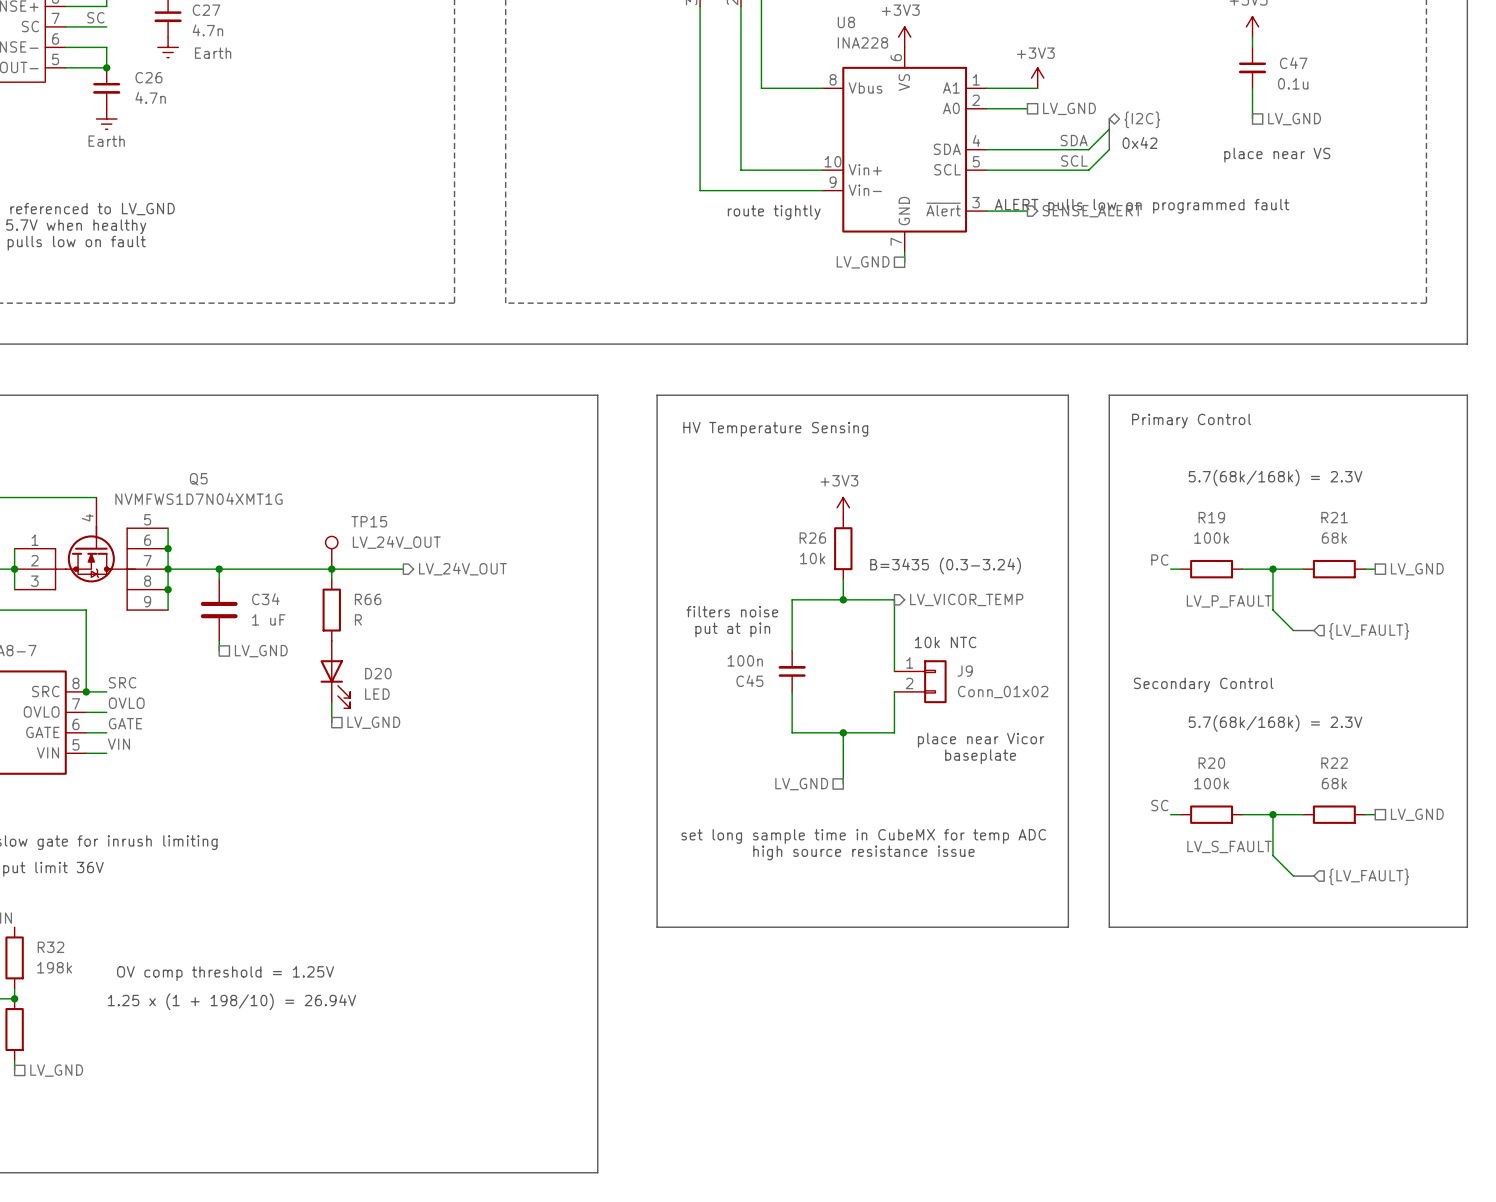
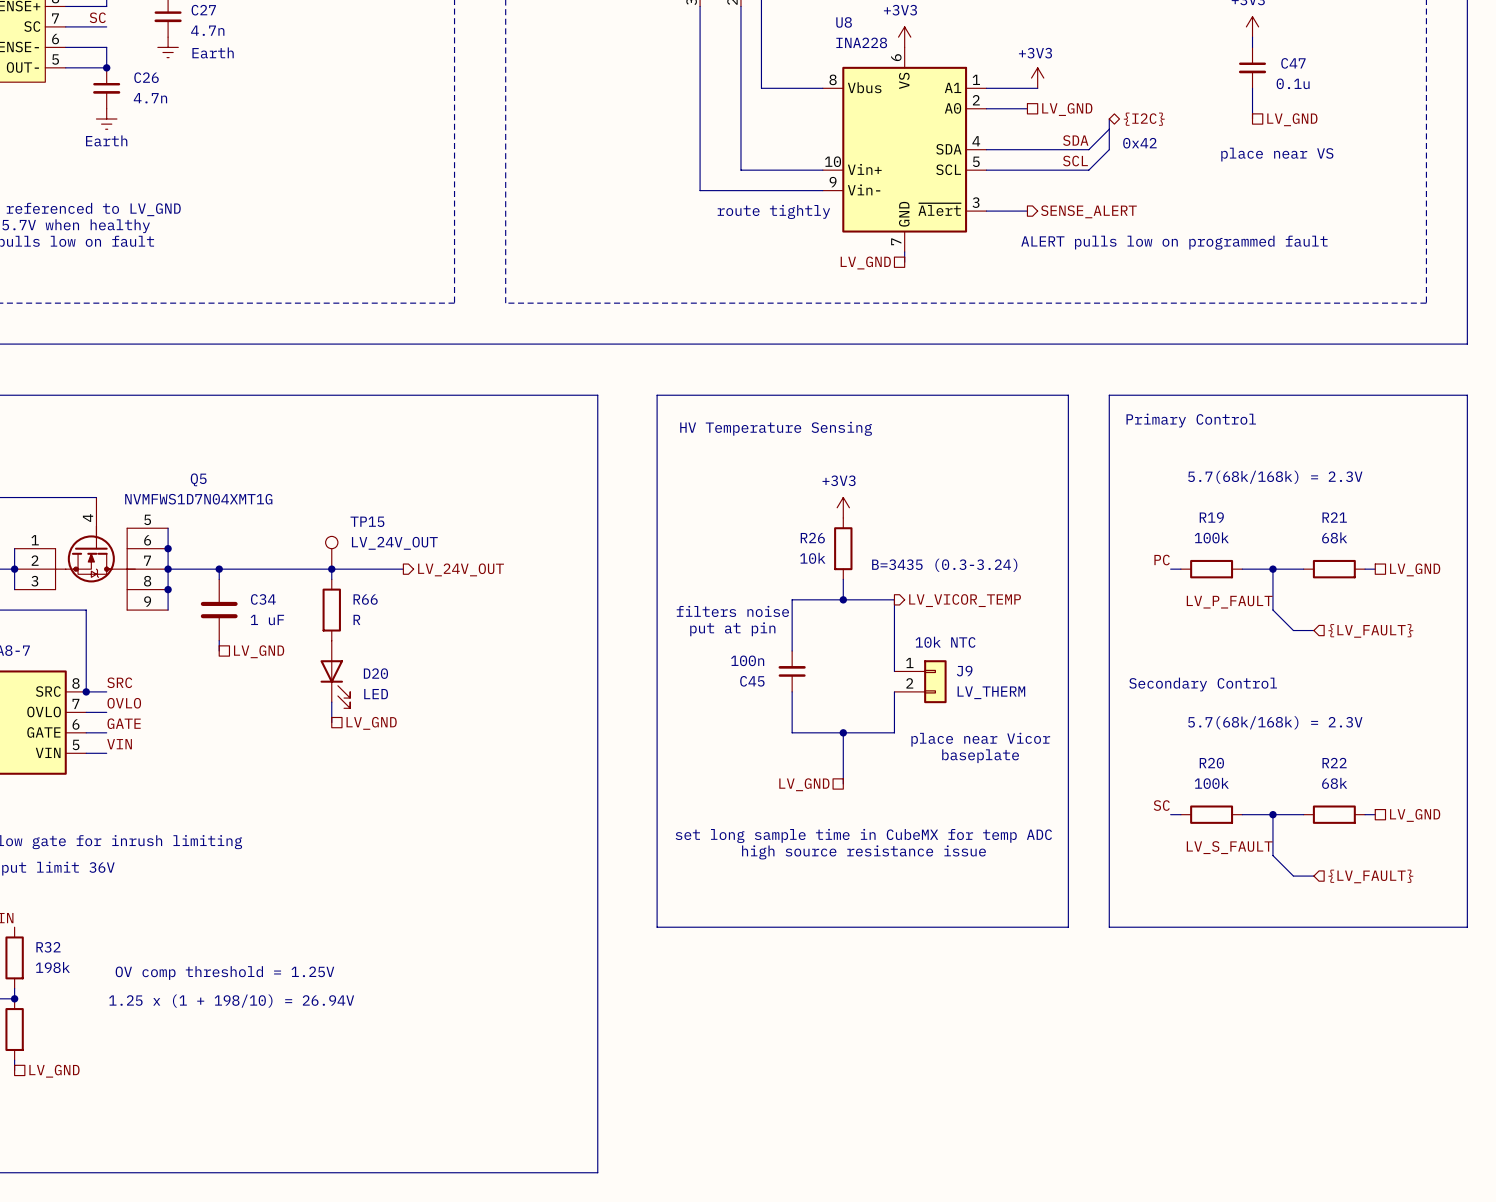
text position: ALERT pulls low on programmed fault (1142, 206) -> ALERT pulls low on programmed fault (1174, 242)
J9 value: Conn_01x02 (1003, 692) -> LV_THERM (991, 692)

